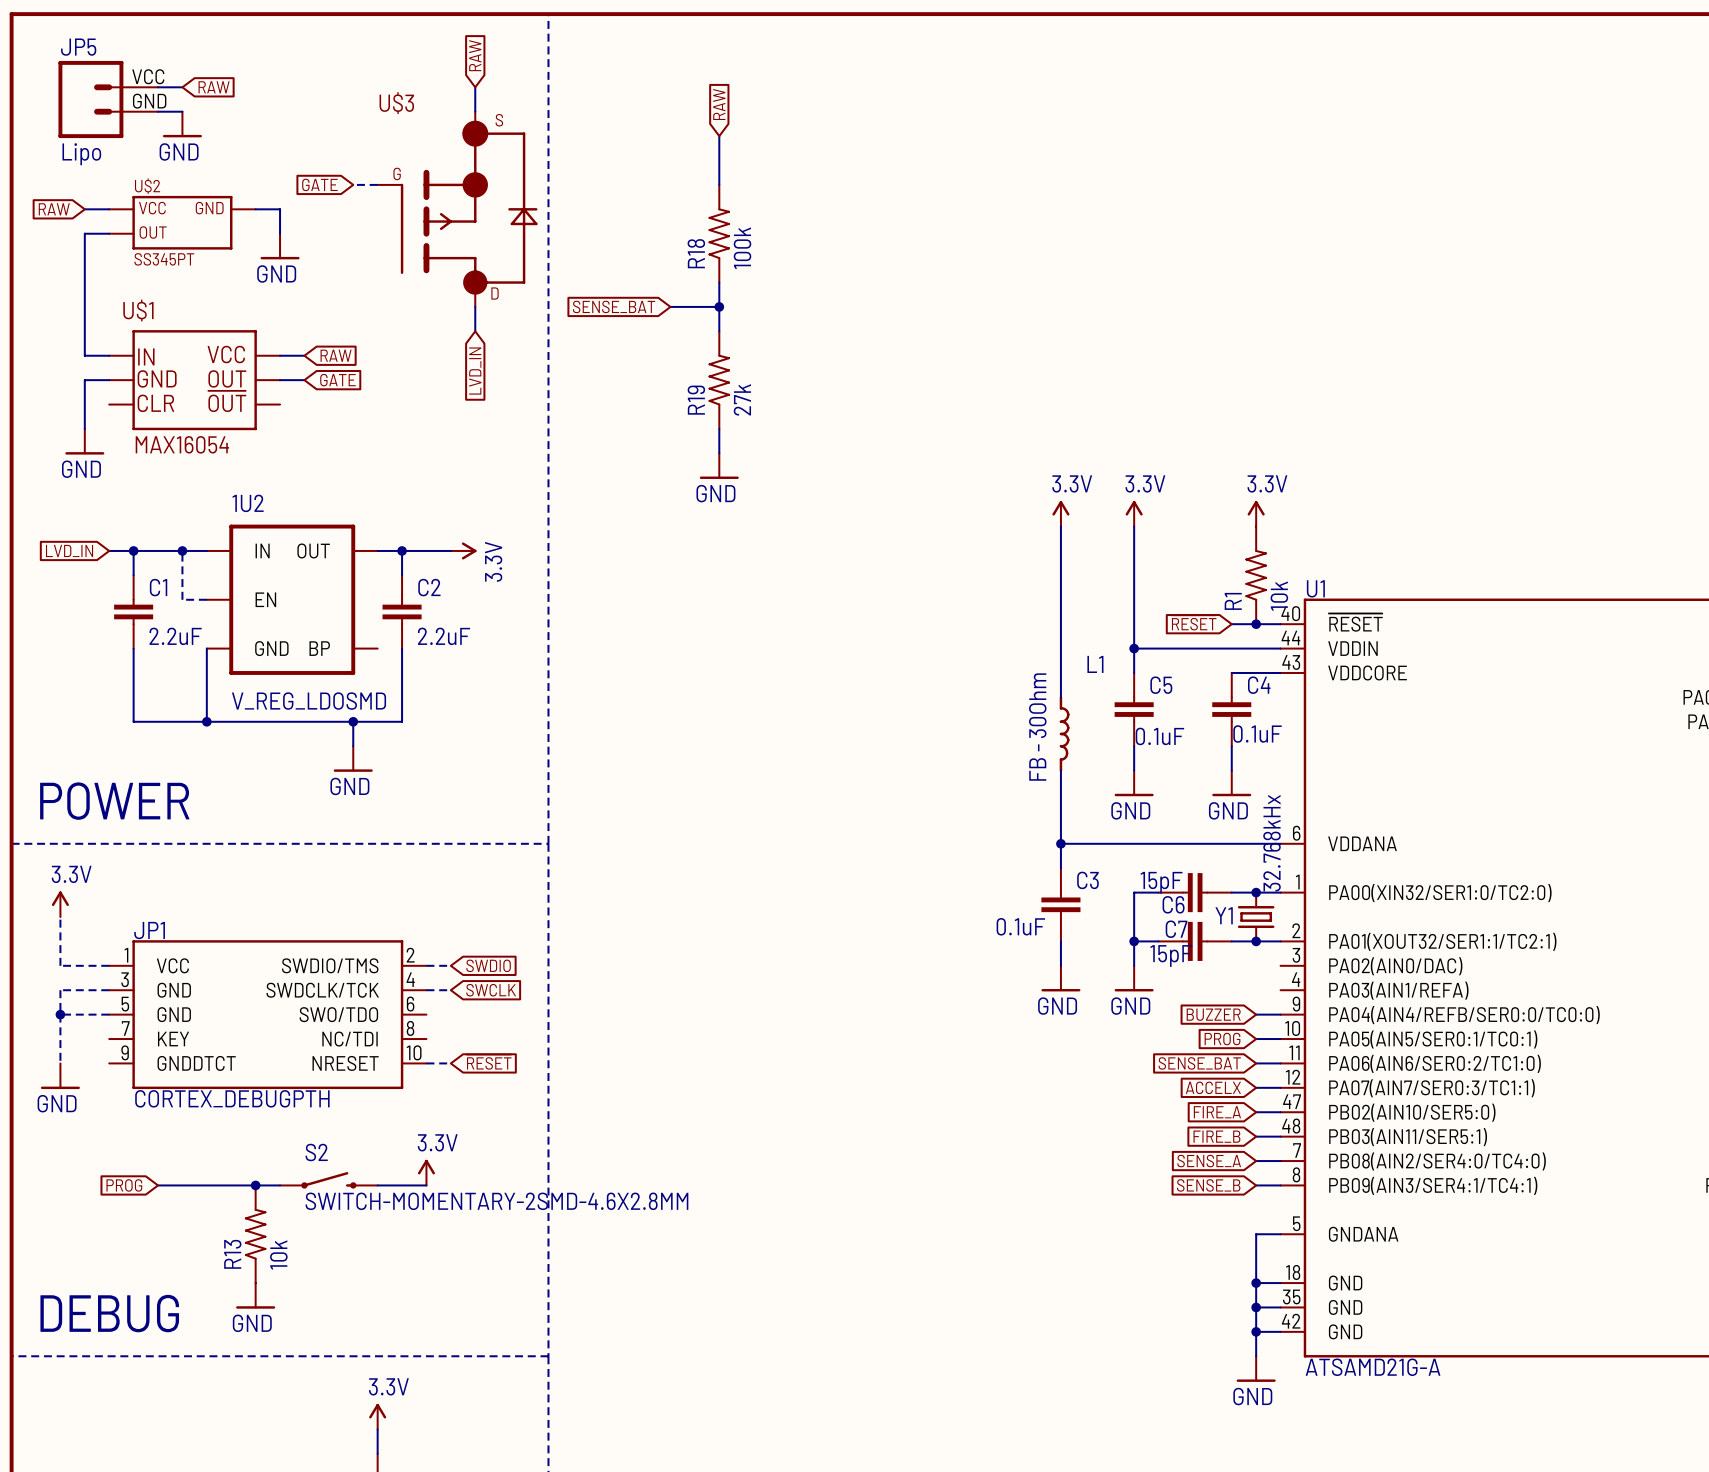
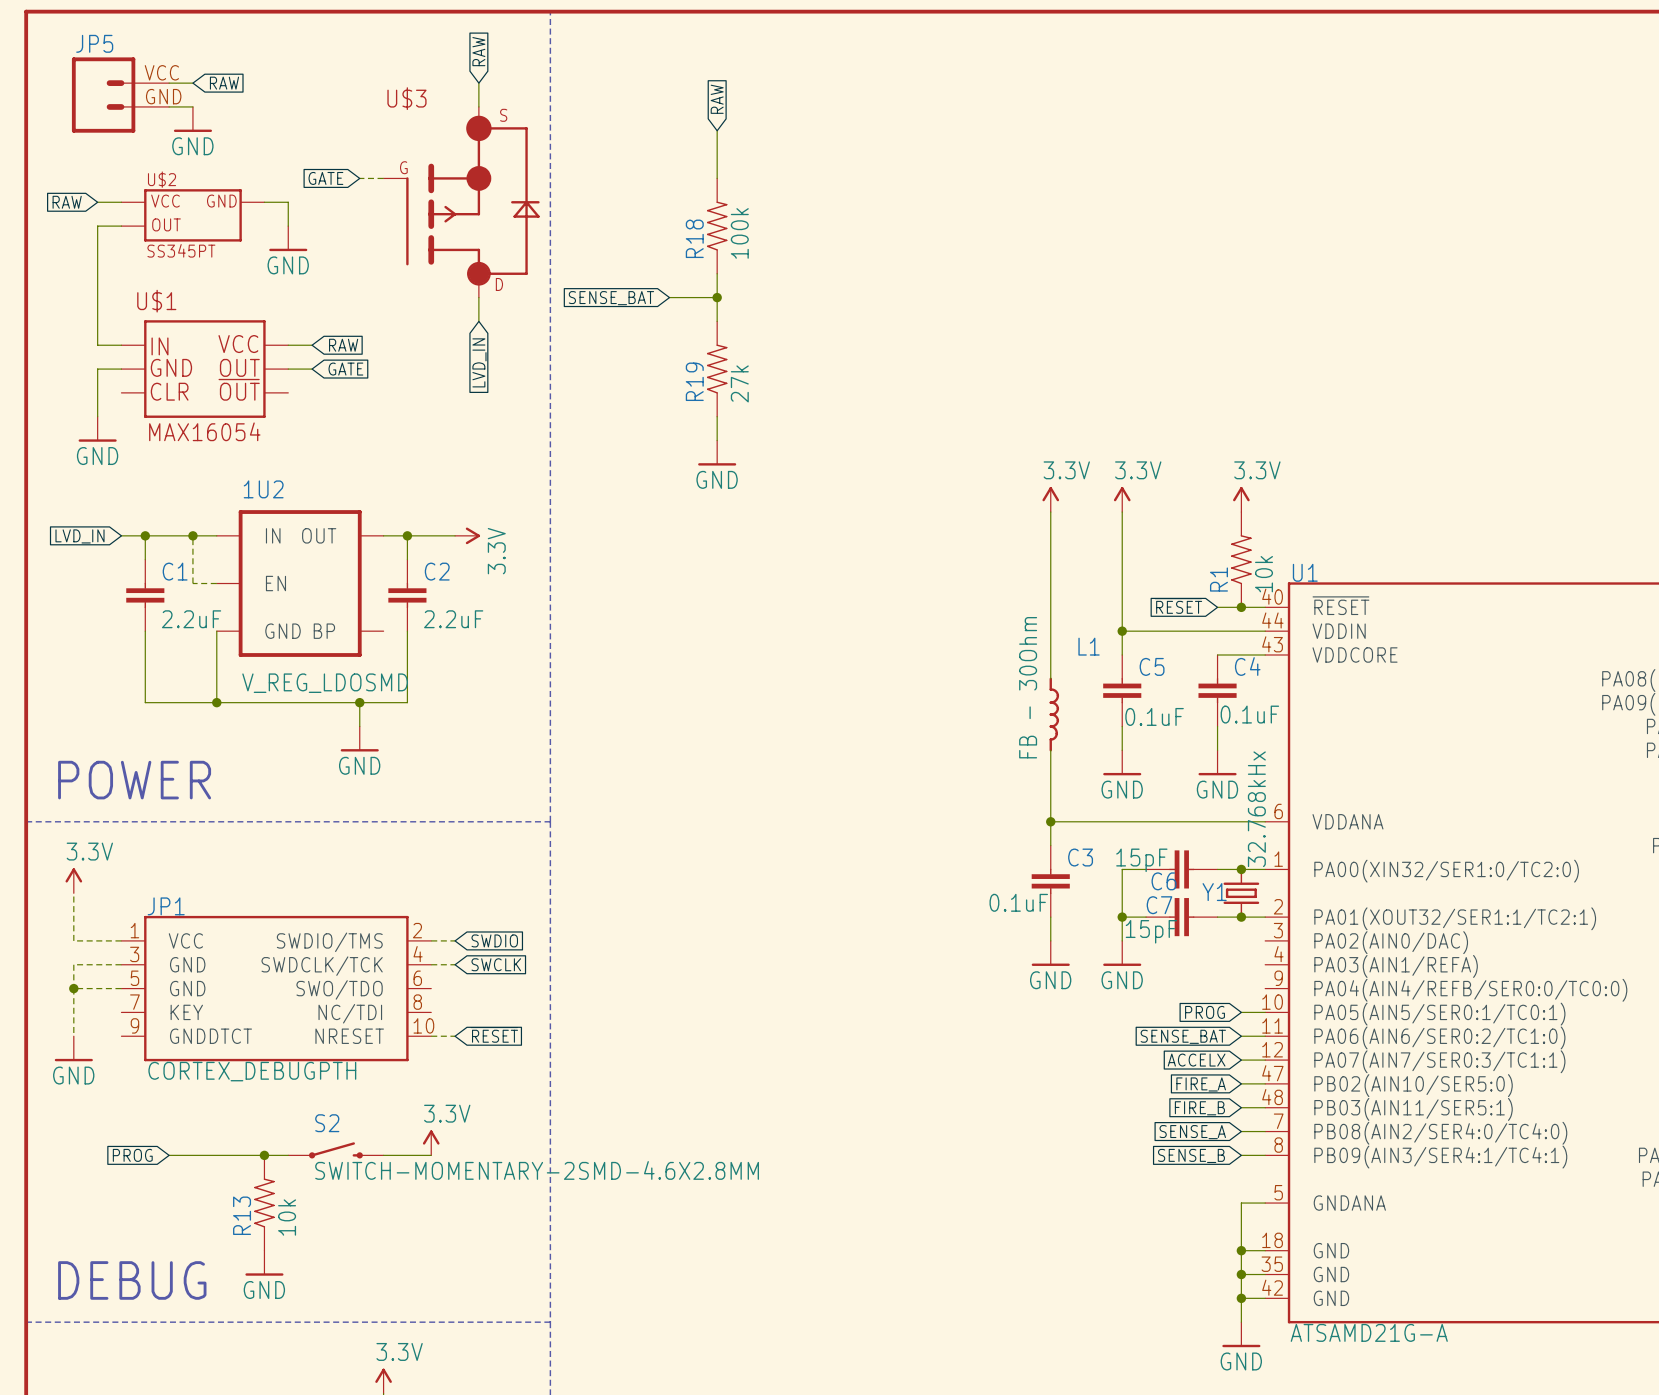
JP5 value: Lipo (81, 154) -> none
global label: BUZZER (1213, 1014) -> none
wire: (1256, 1014) (1280, 1014) -> none

